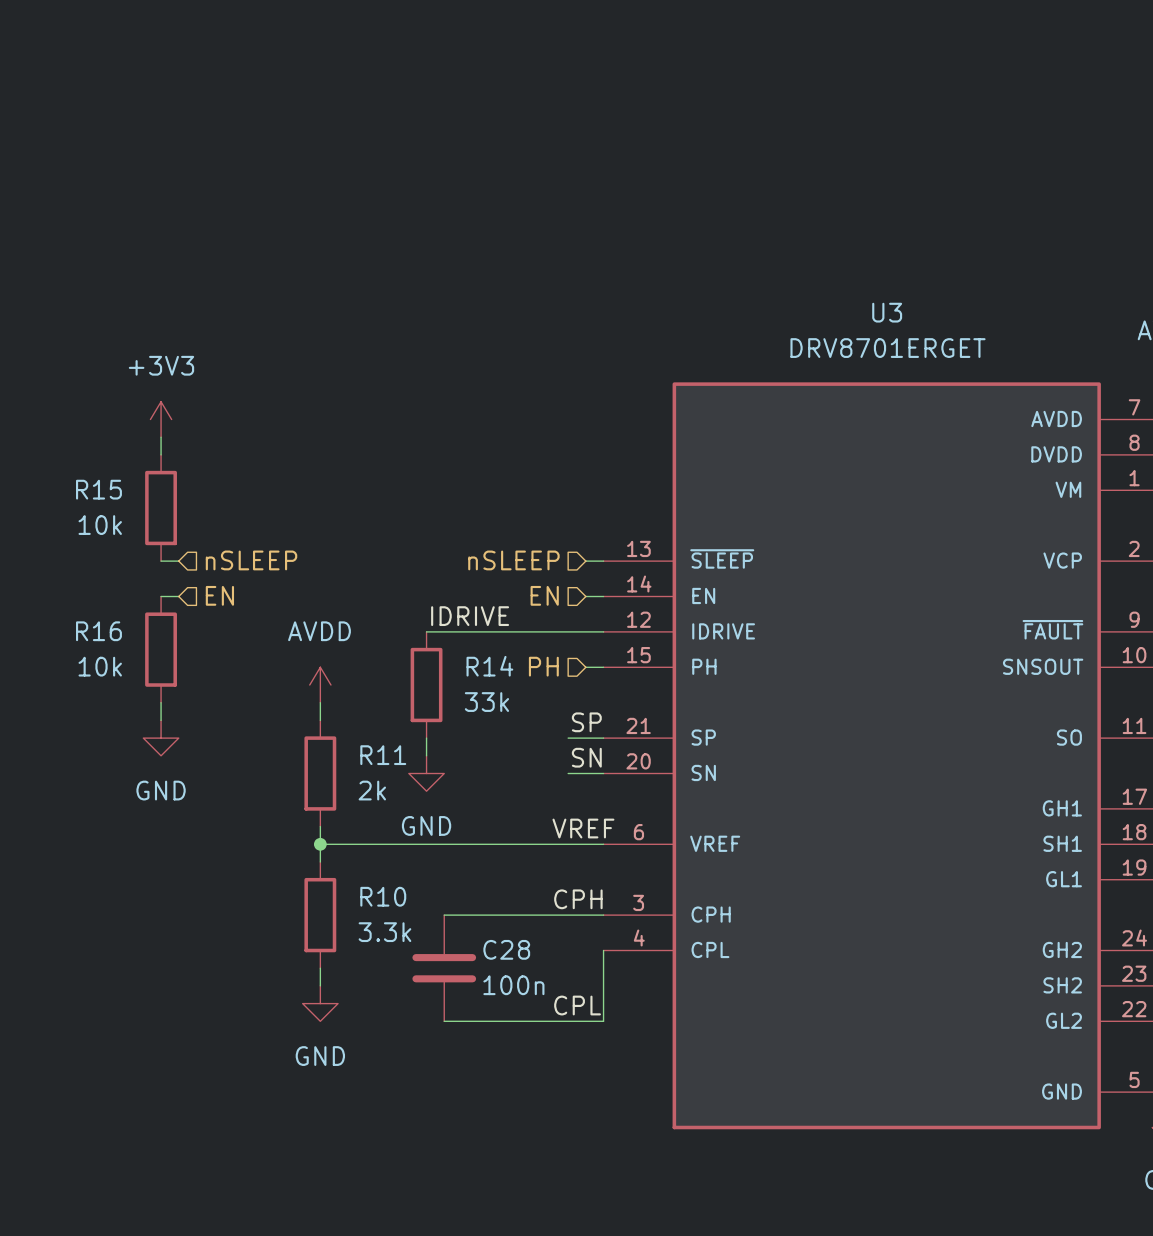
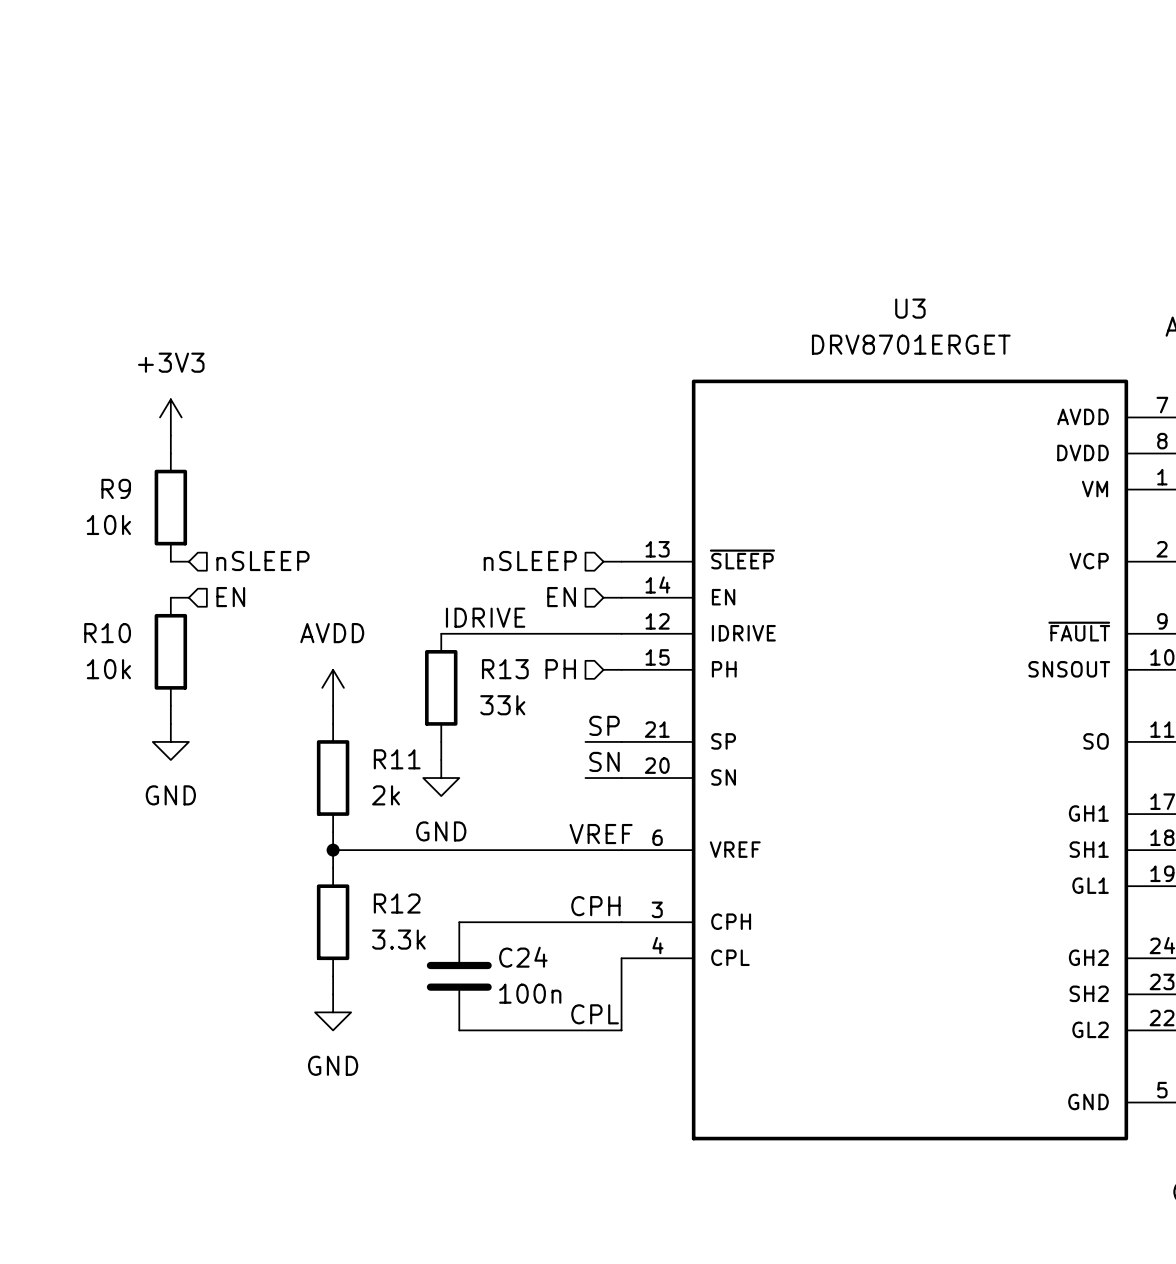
R15 name: R15 (98, 489) -> R9 (116, 488)
R16 name: R16 (98, 631) -> R10 (107, 633)
R14 name: R14 (489, 666) -> R13 (505, 669)
R10 name: R10 (383, 896) -> R12 (397, 903)
C28 name: C28 (506, 949) -> C24 (523, 957)

